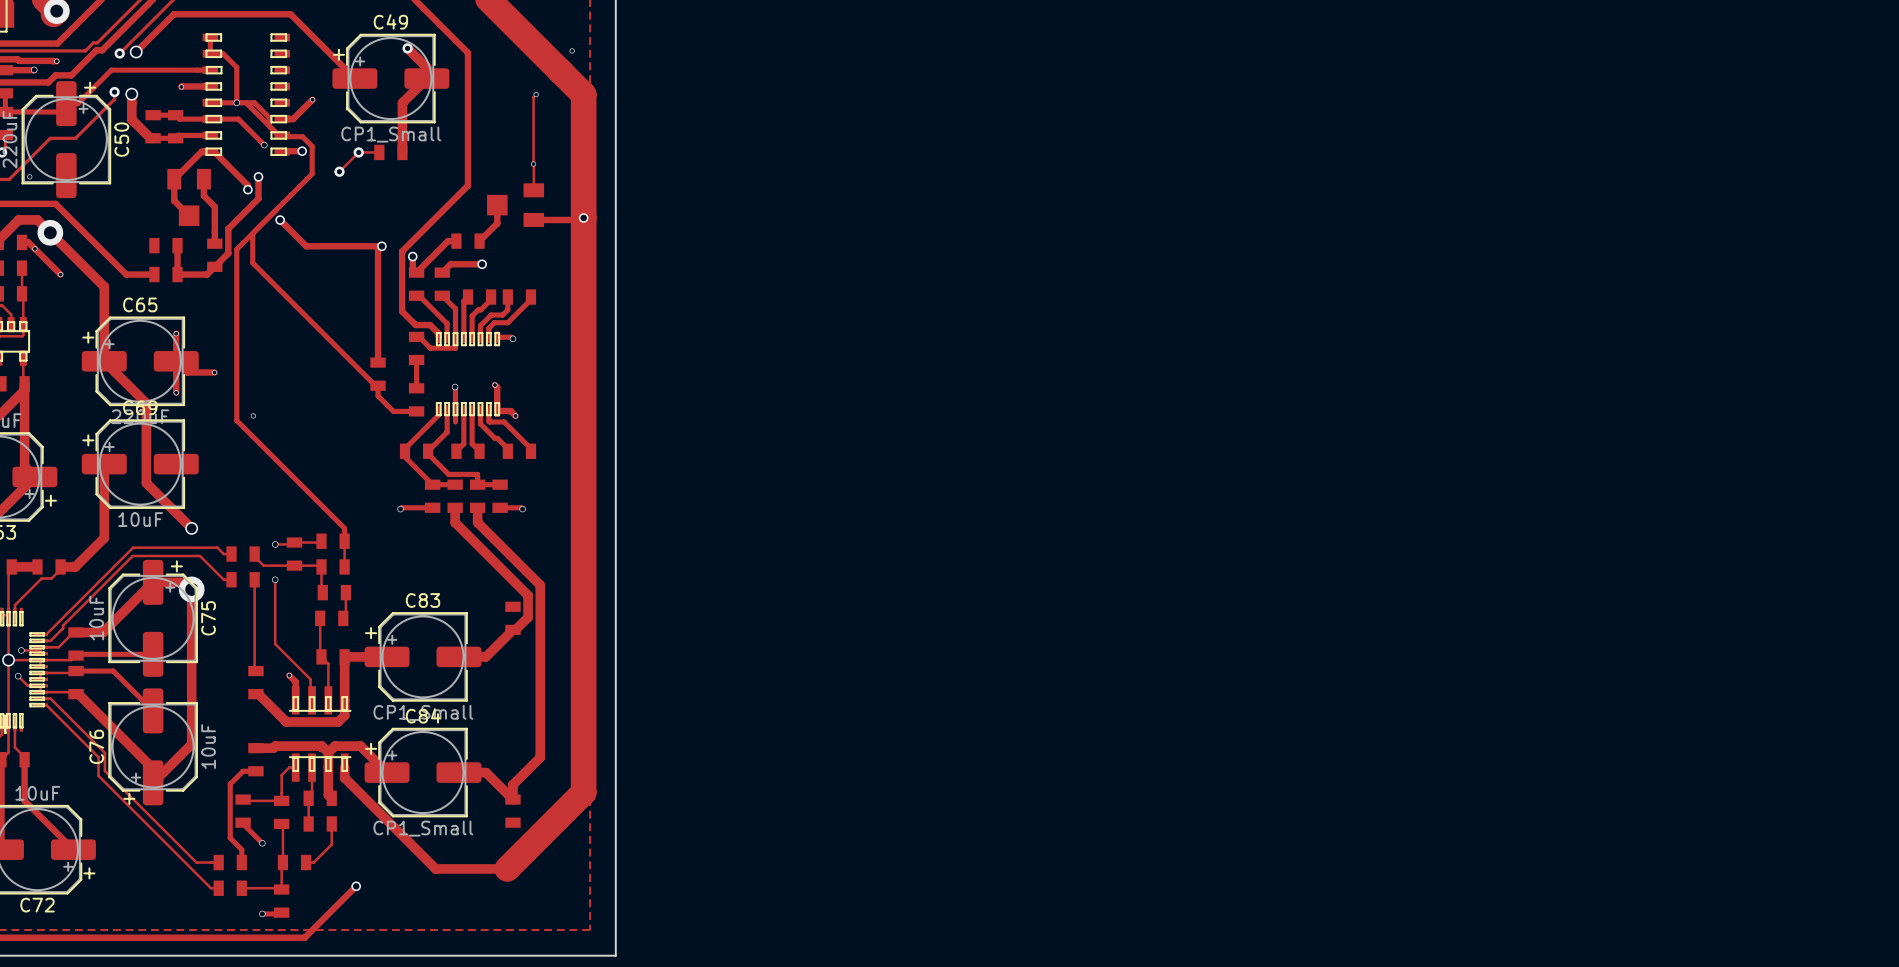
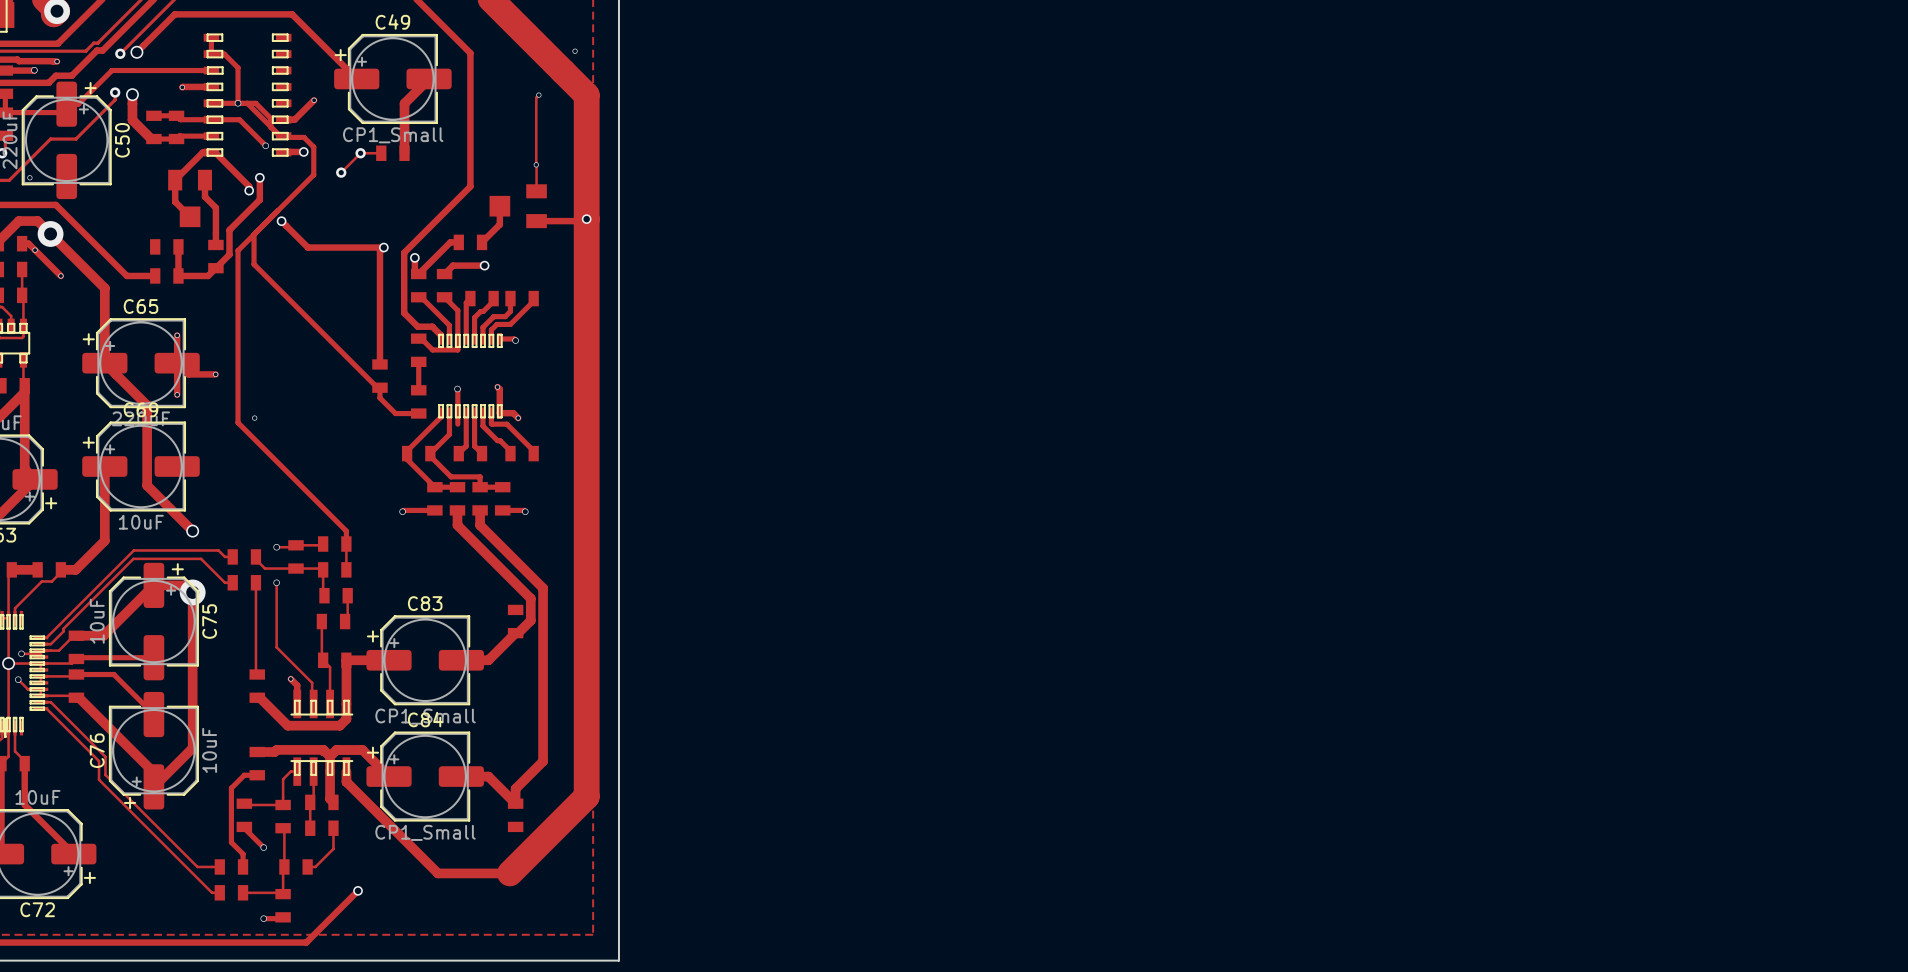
track: (407, 48) (426, 67) (426, 78) -> none
via: (407, 48) -> none

